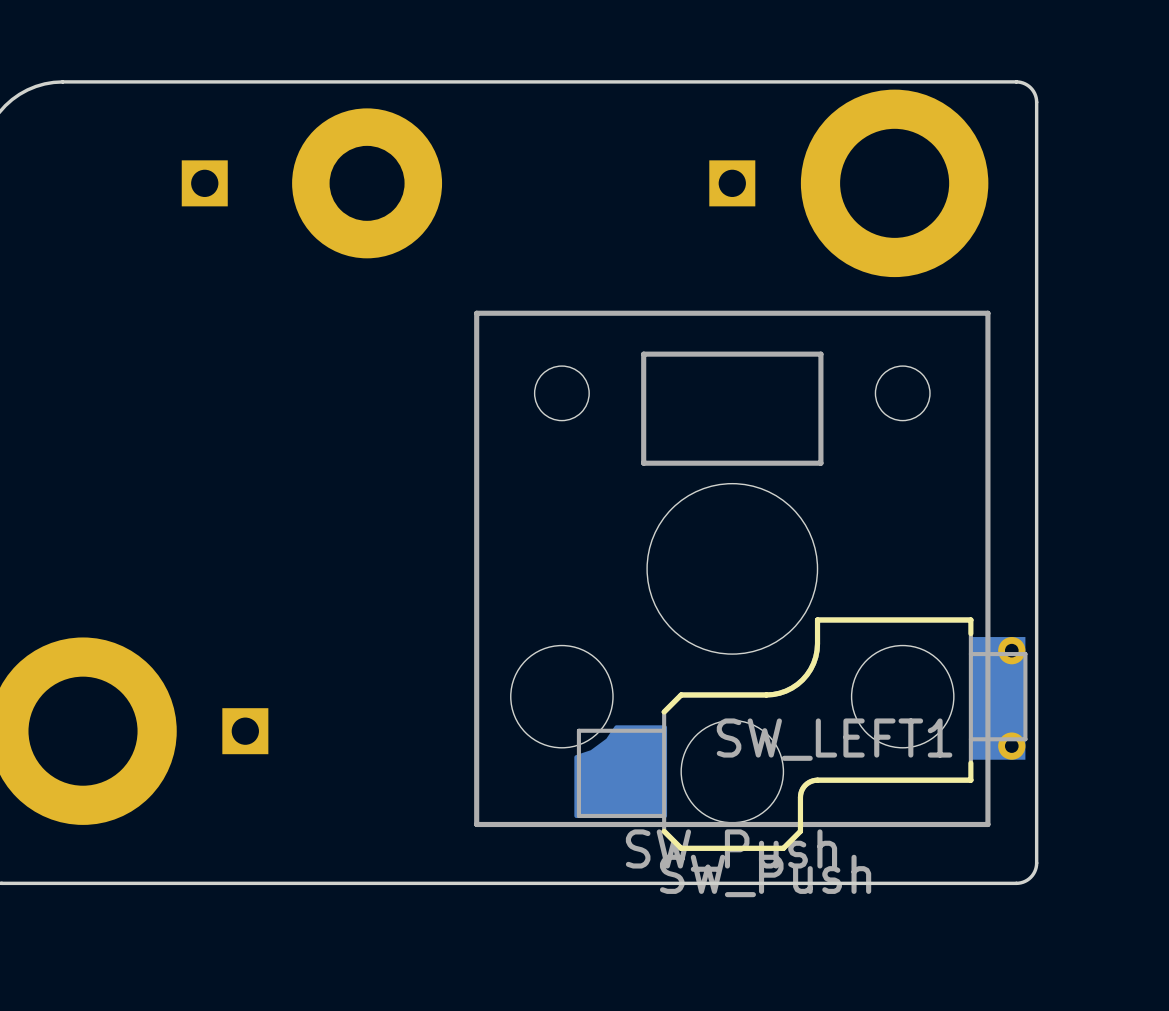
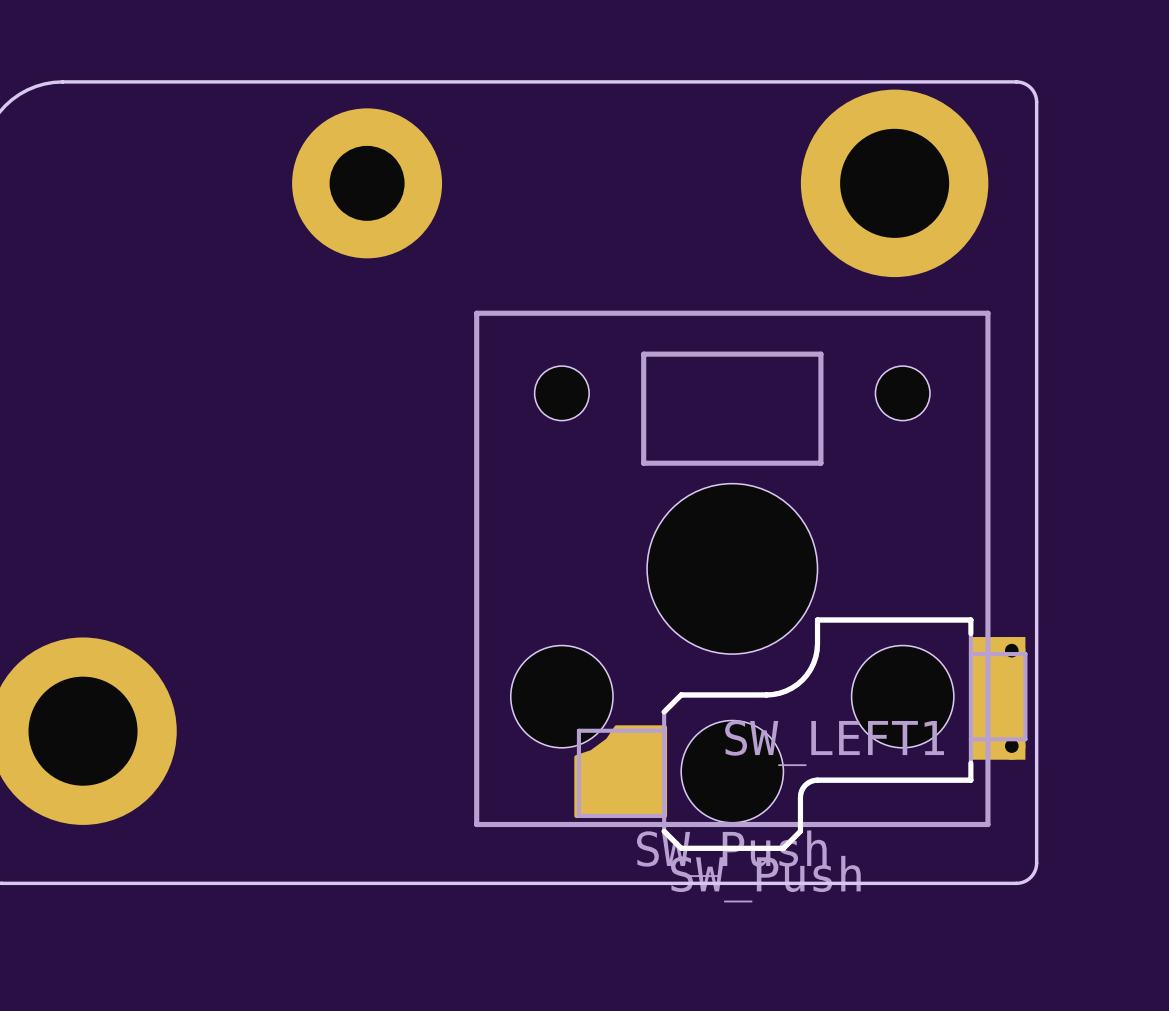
part: (204, 183) -> none
part: (732, 183) -> none
part: (245, 731) -> none

